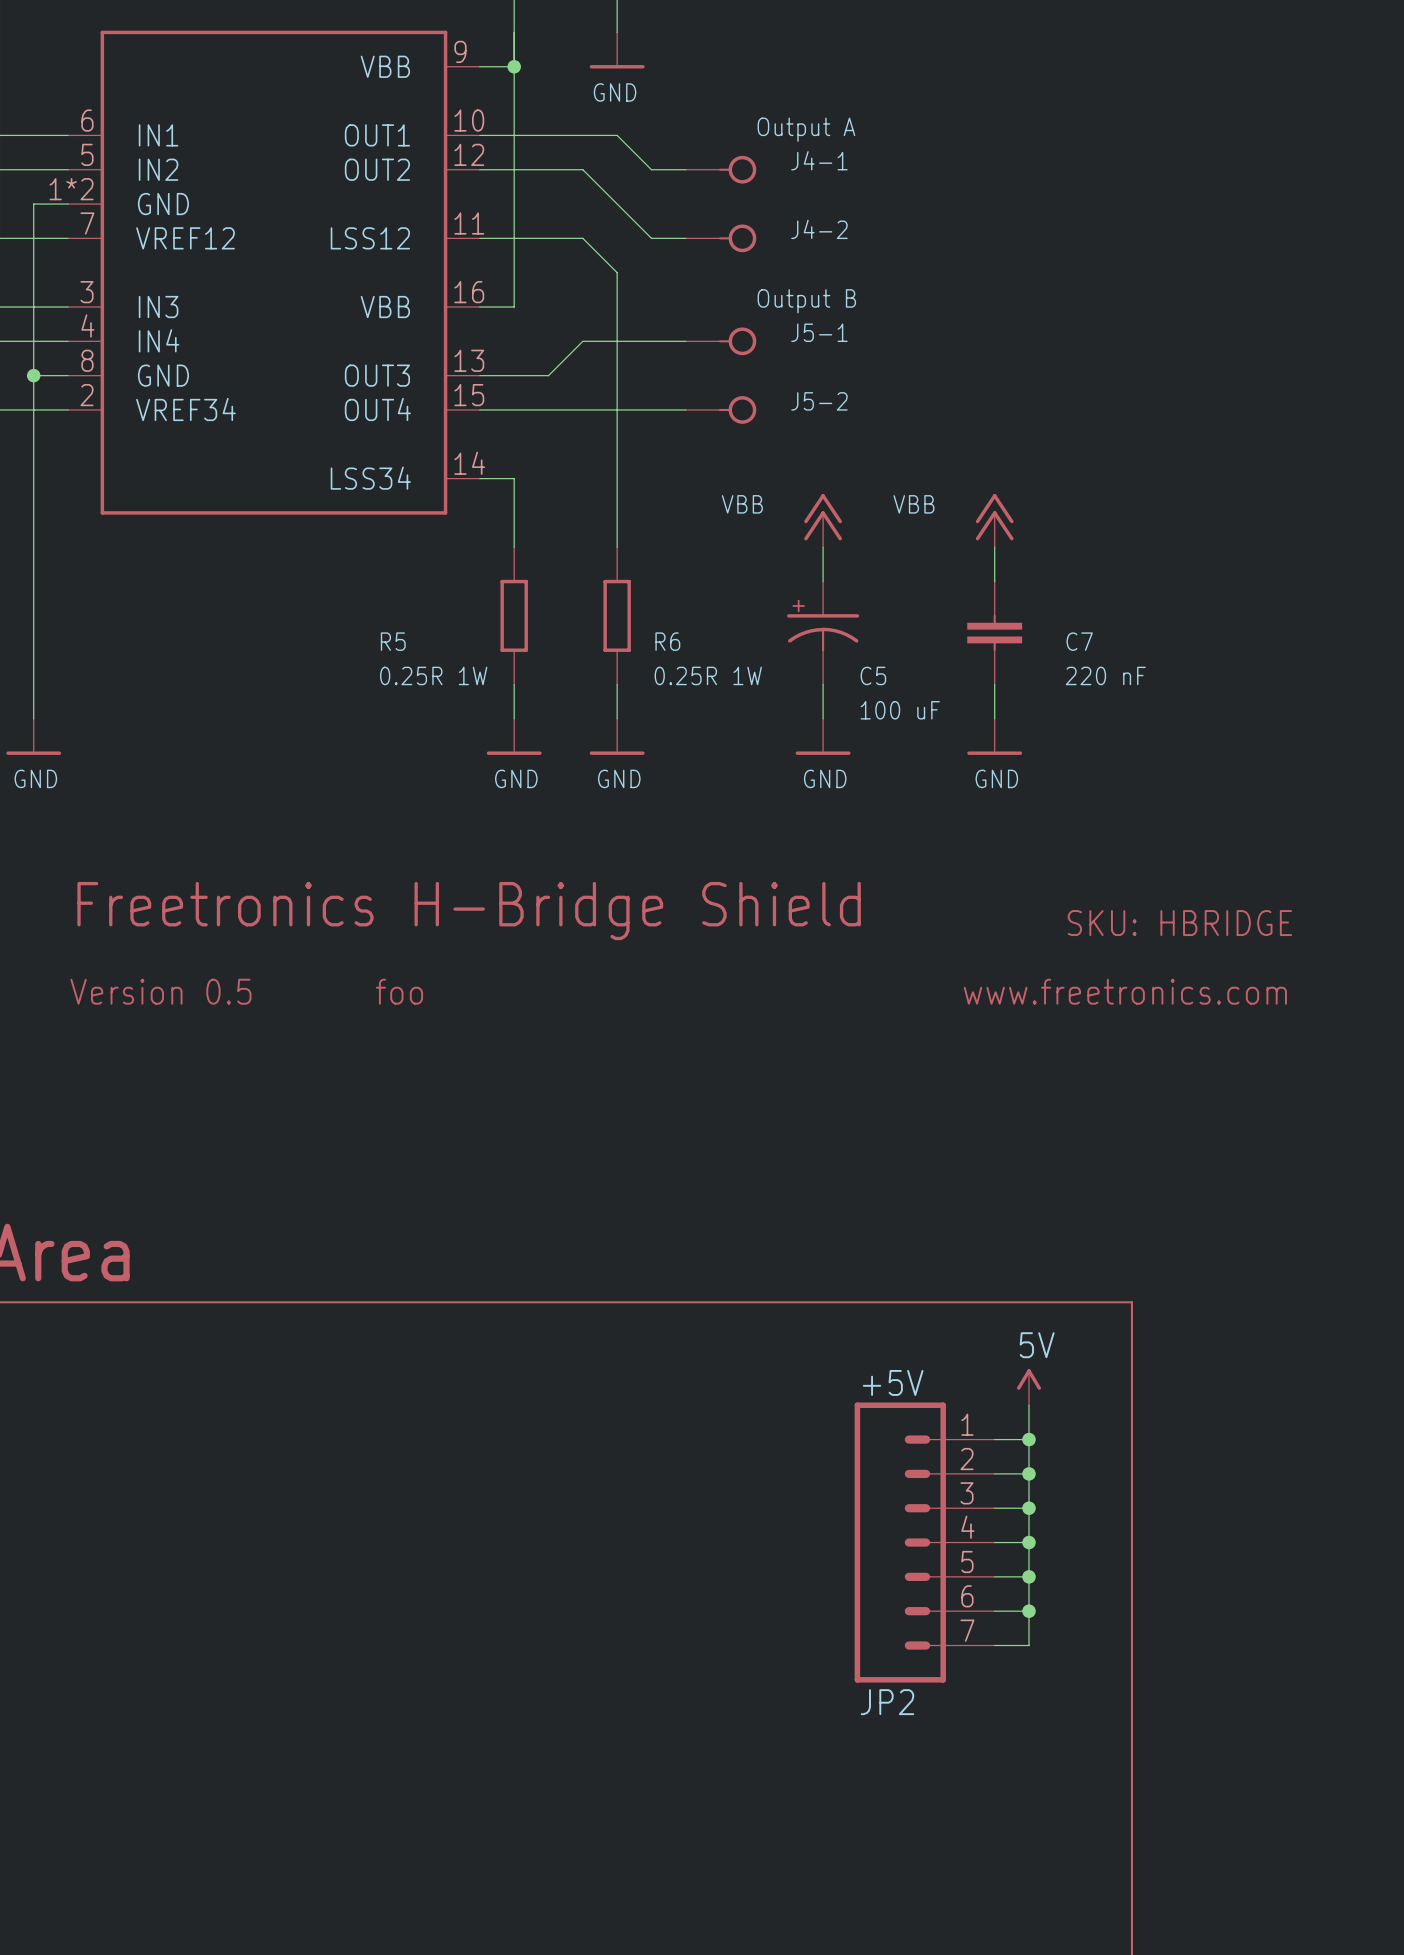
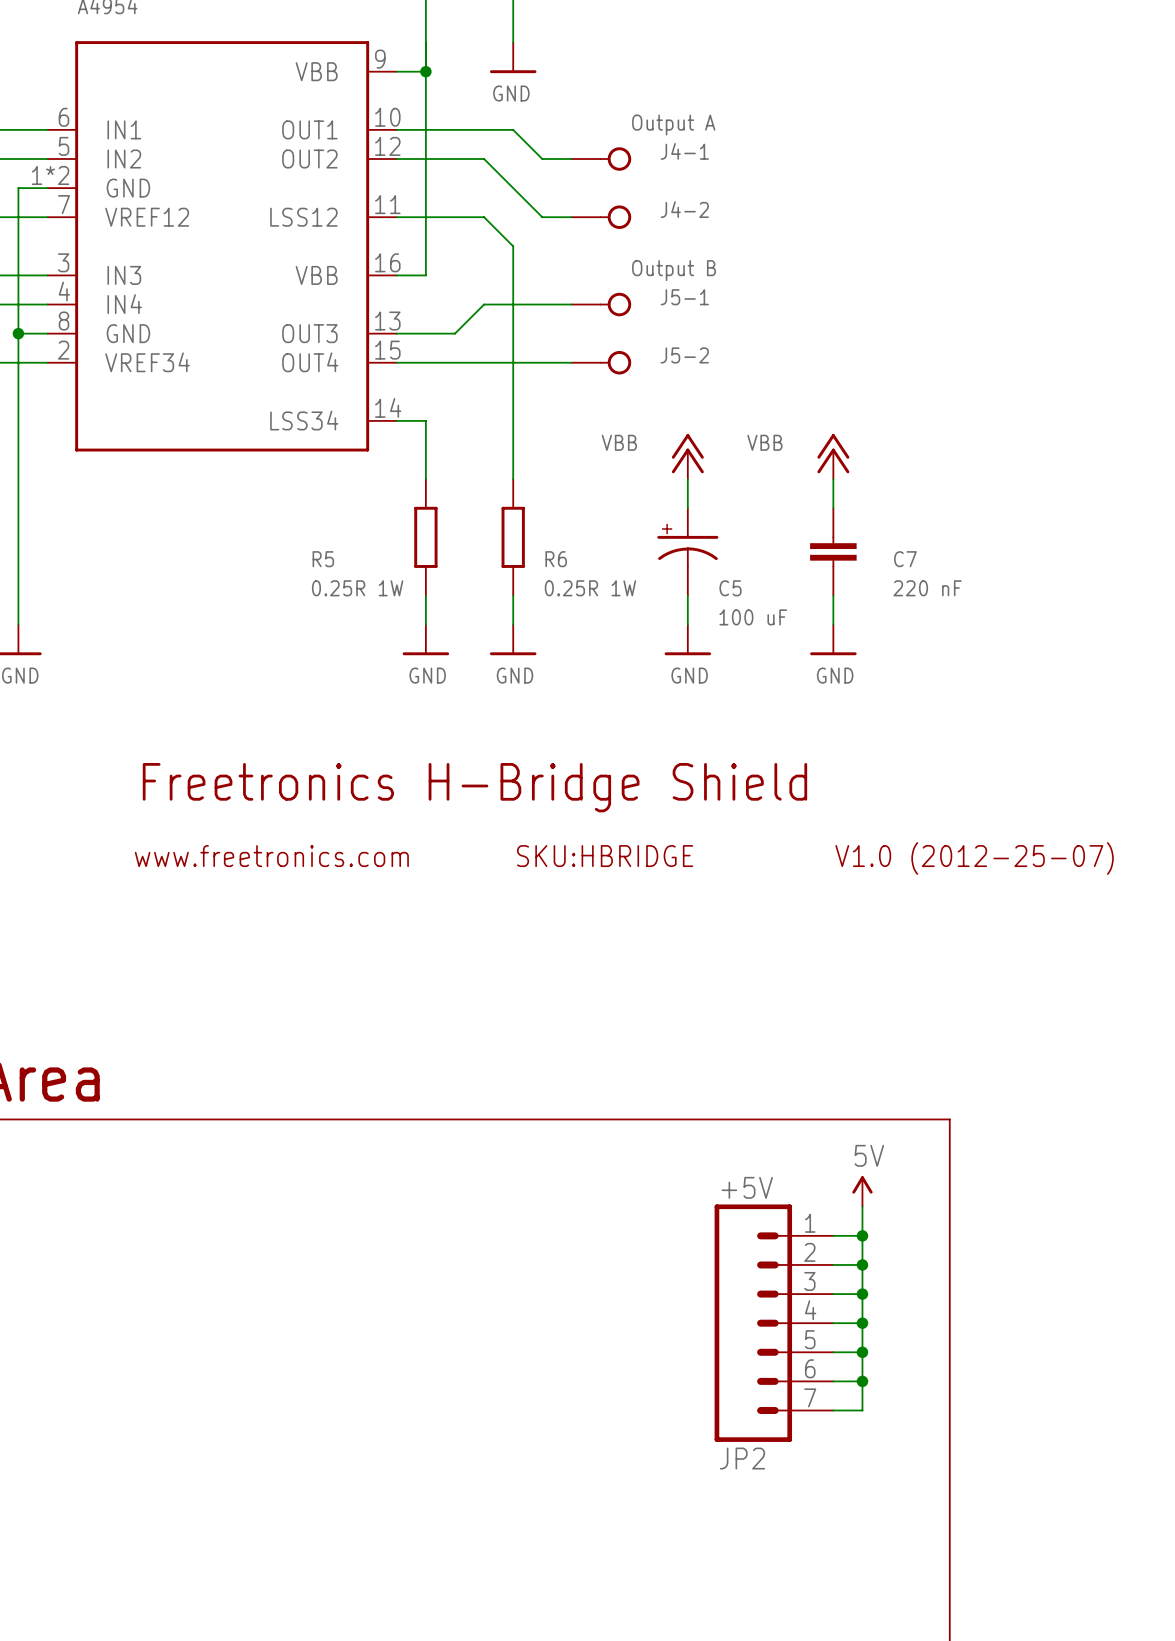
text position: Freetronics H-Bridge Shield (469, 911) -> Freetronics H-Bridge Shield (474, 787)
text: SKU: HBRIDGE (1179, 923) -> none
text: Version 0.5 (160, 991) -> none
text: none -> www.freetronics.com (271, 856)
text: foo (399, 991) -> none
text: none -> SKU:HBRIDGE (605, 856)
text: www.freetronics.com (1125, 991) -> none
text: none -> V1.0 (2012-25-07) (974, 858)

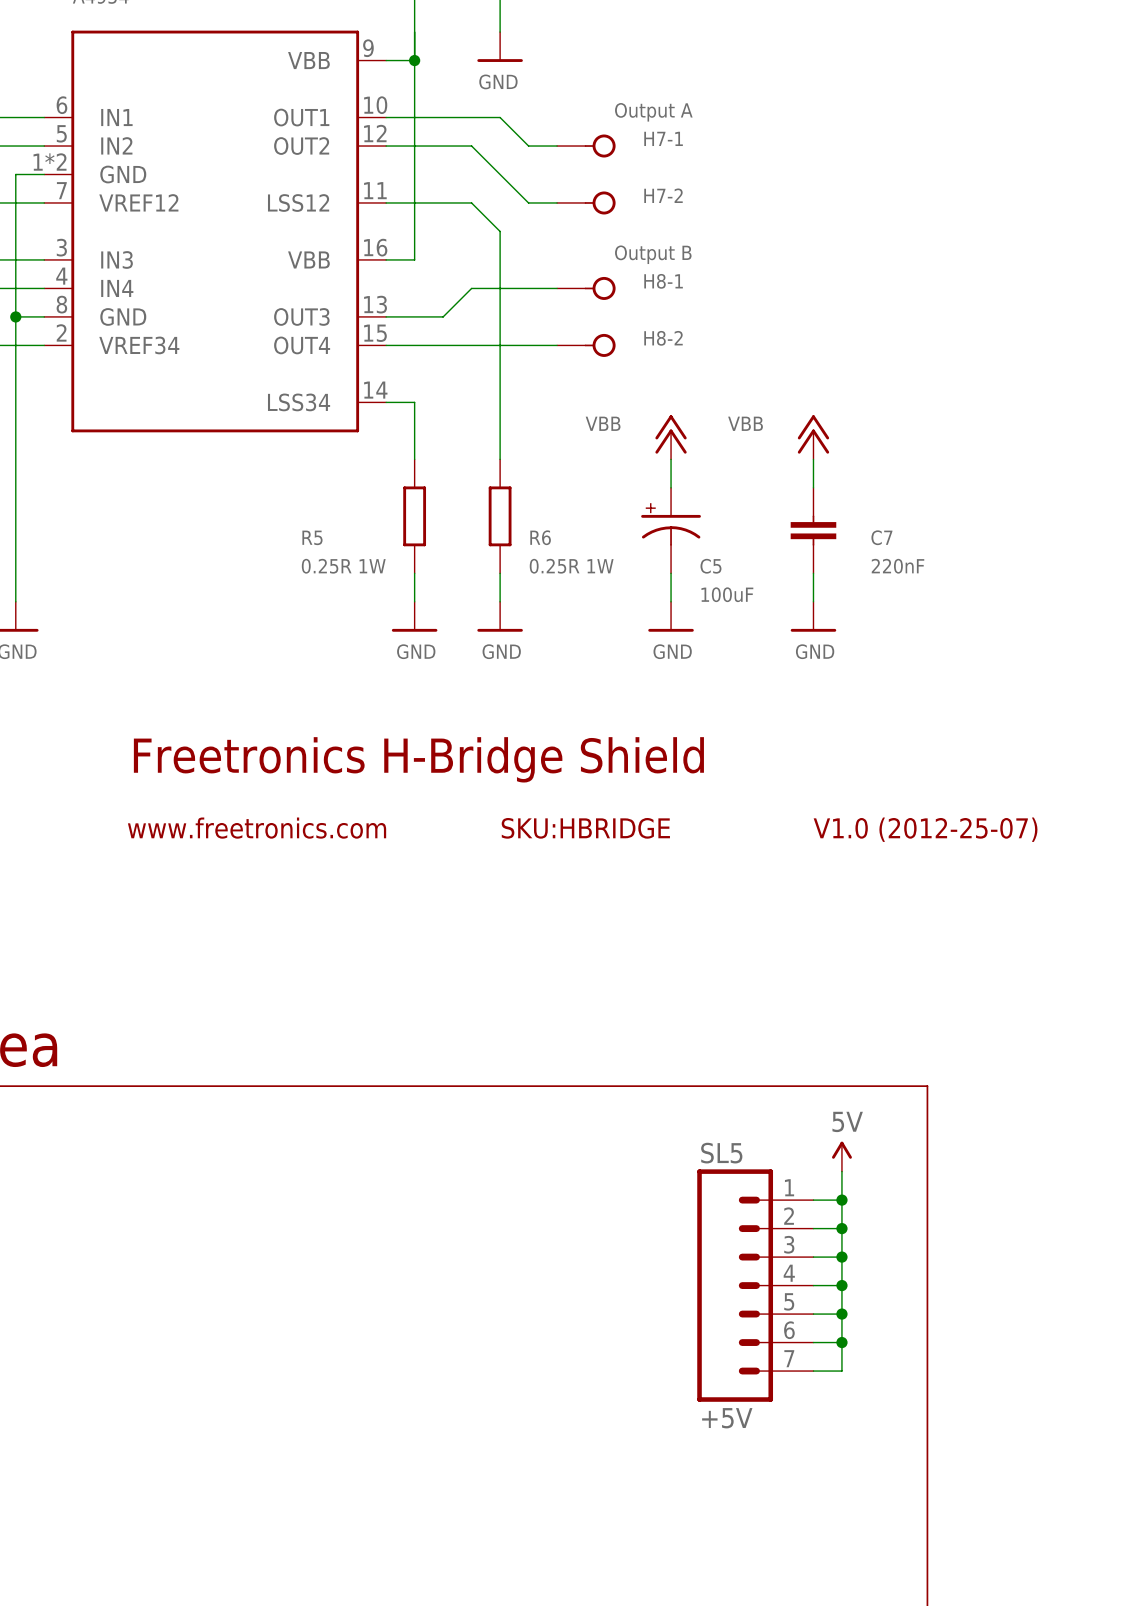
J4-1 name: J4-1 (684, 151) -> H7-1 (663, 138)
J4-2 name: J4-2 (684, 209) -> H7-2 (663, 195)
J5-1 name: J5-1 (684, 297) -> H8-1 (663, 281)
J5-2 name: J5-2 (684, 355) -> H8-2 (663, 338)
C7 value: 220 nF (927, 588) -> 220nF (898, 566)
C5 value: 100 uF (753, 617) -> 100uF (727, 594)
JP2 value position: +5V (747, 1187) -> +5V (727, 1418)
JP2 name: JP2 (742, 1458) -> SL5 (721, 1153)

